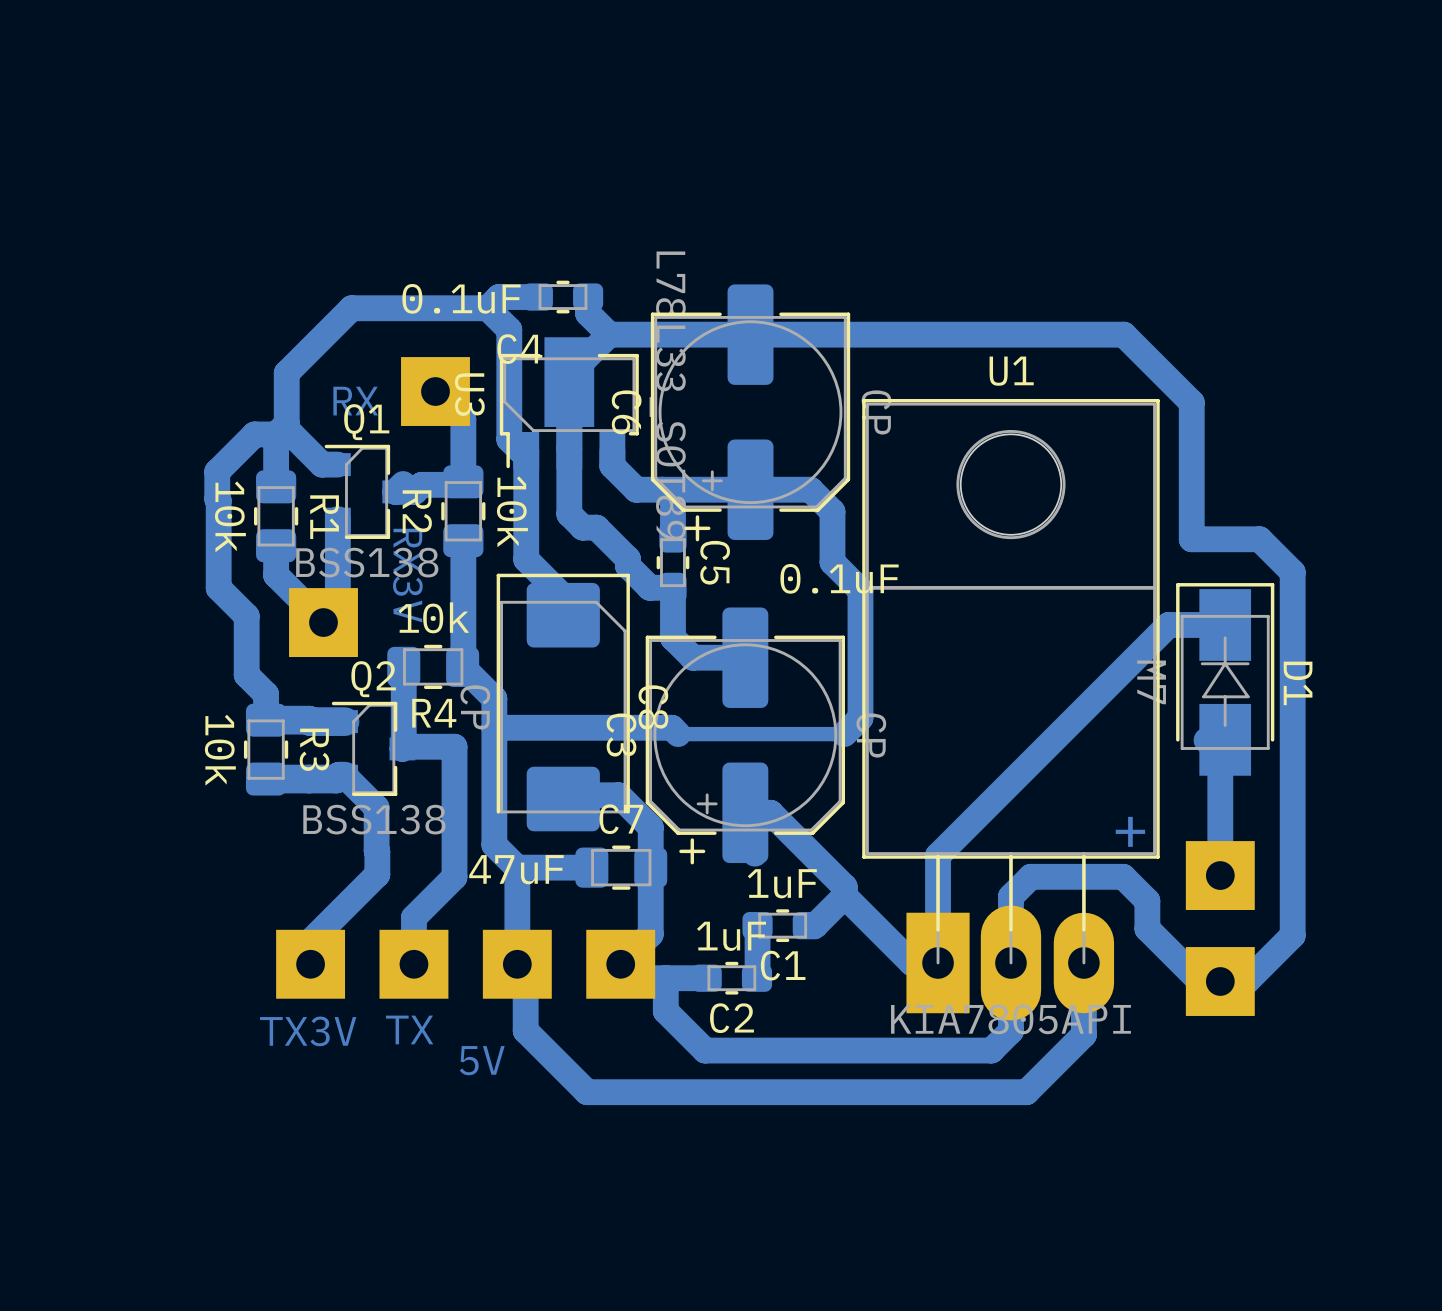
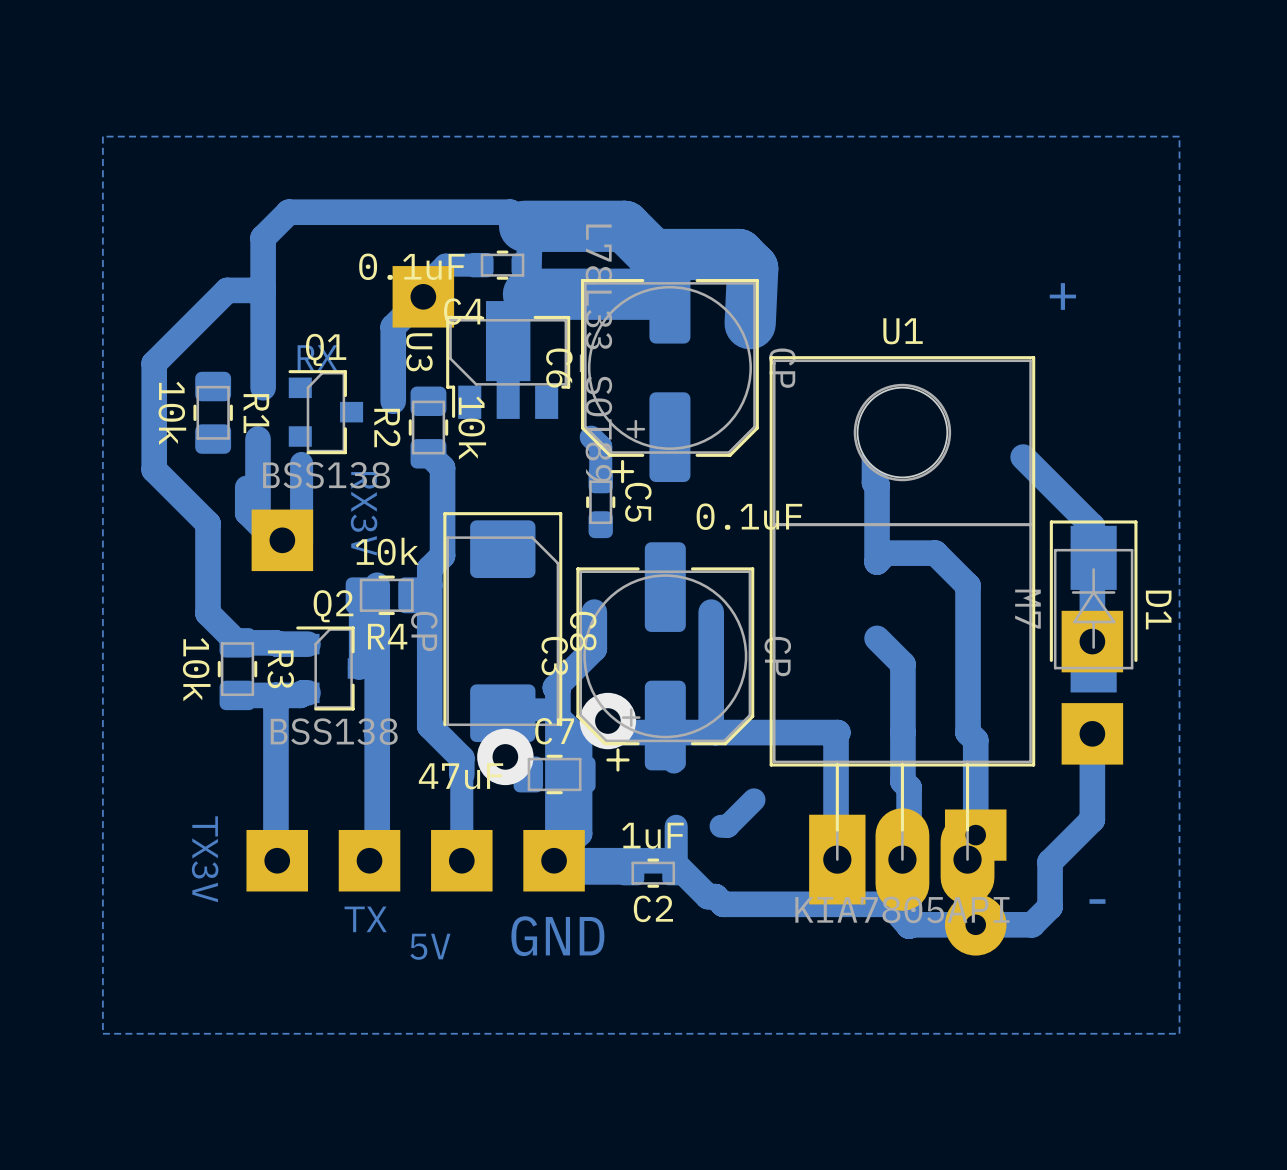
bottom zone outline: none -> (1179, 136) (1179, 1033) (102, 1033) (102, 136) (1179, 136)
bottom track: none -> (524, 226) (624, 226) (652, 254) (738, 254) (752, 268) (750, 323)
bottom track: none -> (652, 294) (528, 294) (529, 231) (510, 212) (288, 212) (263, 237) (263, 387)
bottom track: none -> (423, 296) (393, 326) (393, 401)
bottom track: (435, 391) (463, 419) (463, 481) (460, 484) (421, 484) (414, 491) (395, 491) (403, 483) -> none
part position: (435, 391) -> (423, 296)
bottom track: (612, 450) (612, 465) (636, 489) (810, 489) (832, 511) (832, 562) (860, 590) (860, 718) (844, 734) (678, 734) (671, 727) (494, 727) -> none
bottom track: (337, 464) (322, 464) (291, 434) (254, 434) (217, 471) (218, 588) (246, 616) (246, 674) (266, 694) (266, 720) -> (263, 290) (227, 290) (154, 363) (154, 469) (208, 523) (208, 613) (237, 642)
bottom track: (276, 486) (276, 434) (286, 423) (286, 373) (351, 308) (487, 308) (509, 329) (509, 439) (520, 450) (526, 450) (526, 559) (563, 596) (563, 615) -> none
bottom track: none -> (258, 439) (258, 515) (282, 540)
Q1 position: (366, 491) -> (325, 412)
R2 position: (463, 511) -> (428, 427)
bottom track: none -> (874, 457) (874, 482) (877, 485) (877, 562) (886, 553) (935, 553) (968, 585) (968, 732) (975, 740) (975, 835)
bottom track: none -> (1023, 457) (1092, 526) (1092, 641)
R1 position: (276, 516) -> (213, 412)
bottom track: (463, 540) (462, 666) (494, 698) (494, 844) (517, 867) -> (428, 453) (442, 467) (442, 555) (429, 568) (429, 726) (461, 758) (461, 774)
part position: (323, 622) -> (282, 540)
bottom track: (1225, 624) (1168, 624) (938, 855) (938, 962) (911, 962) (844, 896) (844, 886) (770, 812) (745, 812) -> none
bottom track: (745, 657) (692, 657) (672, 637) (672, 587) (649, 587) (627, 565) (627, 558) (596, 527) (582, 527) (569, 514) (569, 374) (609, 334) (1123, 334) (1191, 402) (1191, 539) (1259, 539) (1292, 572) (1292, 935) (1246, 981) (1200, 981) (1147, 928) (1147, 900) (1123, 876) (1030, 876) (1010, 896) (1010, 1031) (991, 1050) (705, 1050) (665, 1011) (665, 978) -> none
bottom track: none -> (594, 612) (594, 648) (555, 687) (557, 688) (557, 856)
bottom track: none -> (711, 612) (711, 728) (715, 732)
bottom track: none -> (877, 638) (902, 664) (902, 781) (909, 787) (909, 926)
part: none -> (1092, 641)
bottom track: (1225, 739) (1220, 744) (1220, 875) -> none
bottom track: (404, 746) (454, 746) (454, 877) (413, 917) (413, 964) -> (377, 585) (377, 853) (369, 860)
bottom track: (345, 776) (376, 807) (377, 874) (310, 941) (310, 964) -> none
bottom track: none -> (275, 695) (275, 859)
bottom track: none -> (607, 721) (619, 732) (837, 732) (836, 734) (836, 821)
via: none -> (607, 721)
bottom track: none -> (1092, 733) (1092, 819) (1050, 862) (1050, 906) (1032, 924) (909, 926)
text position: + (1130, 831) -> + (1062, 296)
via: none -> (505, 756)
bottom track: (591, 867) (517, 867) -> none
part position: (1220, 875) -> (1092, 733)
C1: 1uF (782, 925) -> none
bottom track: (1083, 962) (1083, 1034) (1026, 1092) (587, 1092) (525, 1030) (525, 972) (517, 964) -> none
bottom track: none -> (554, 860) (671, 860) (707, 896) (715, 896) (723, 904) (889, 904) (909, 926)
part: (1220, 981) -> none
part: none -> (975, 882)
text: none -> - (1097, 901)
text rotation: 0° (308, 1031) -> 90° clockwise (205, 859)
text: none -> GND (557, 936)

